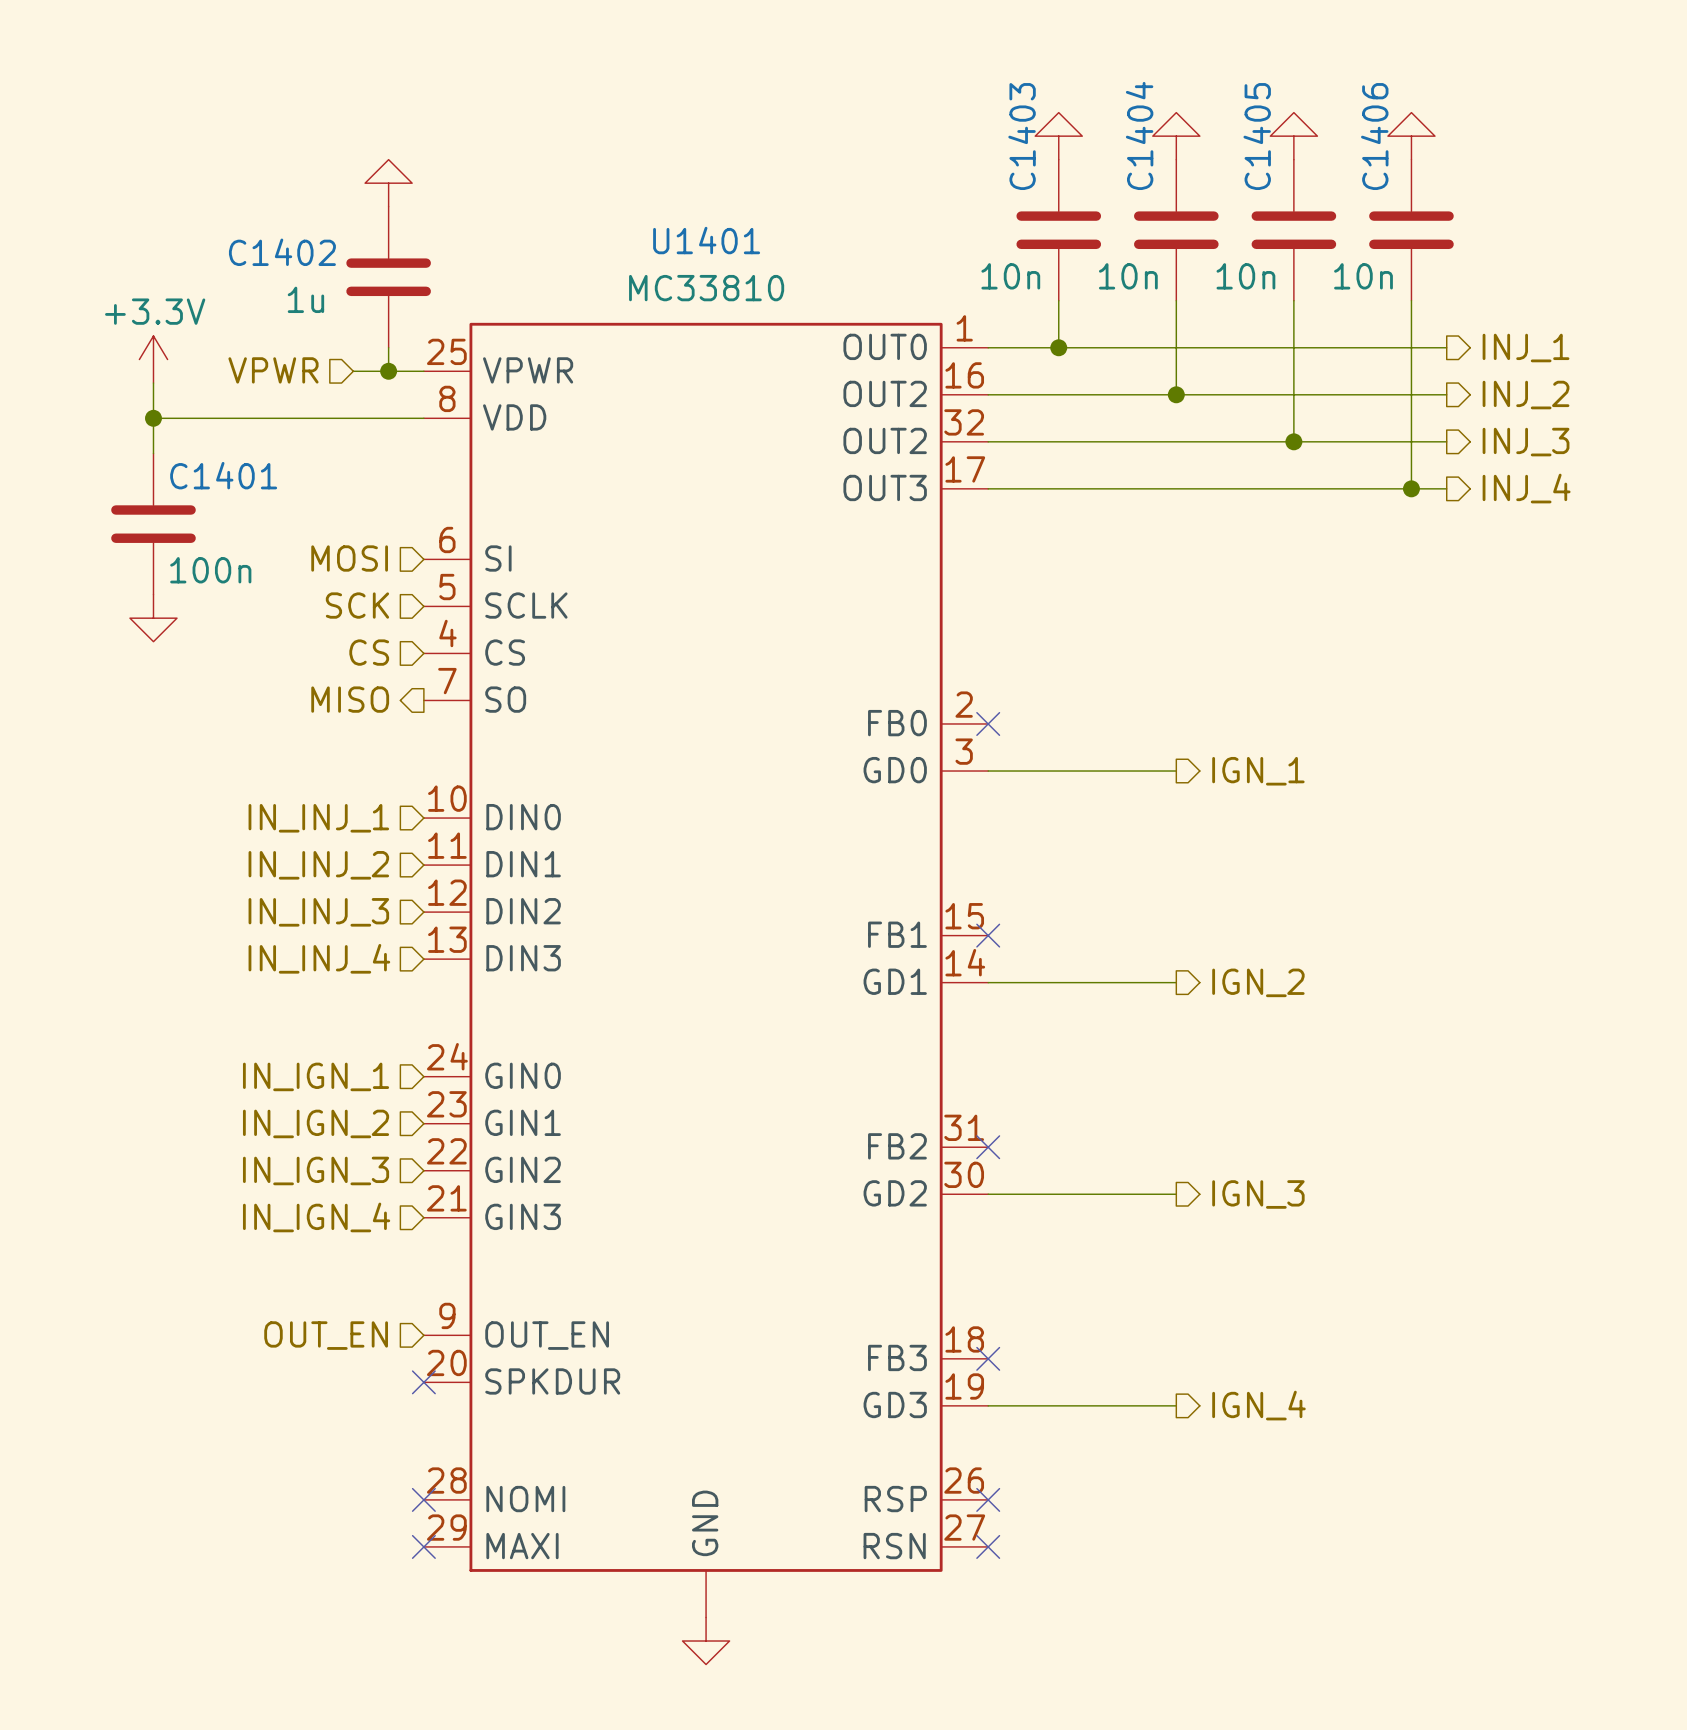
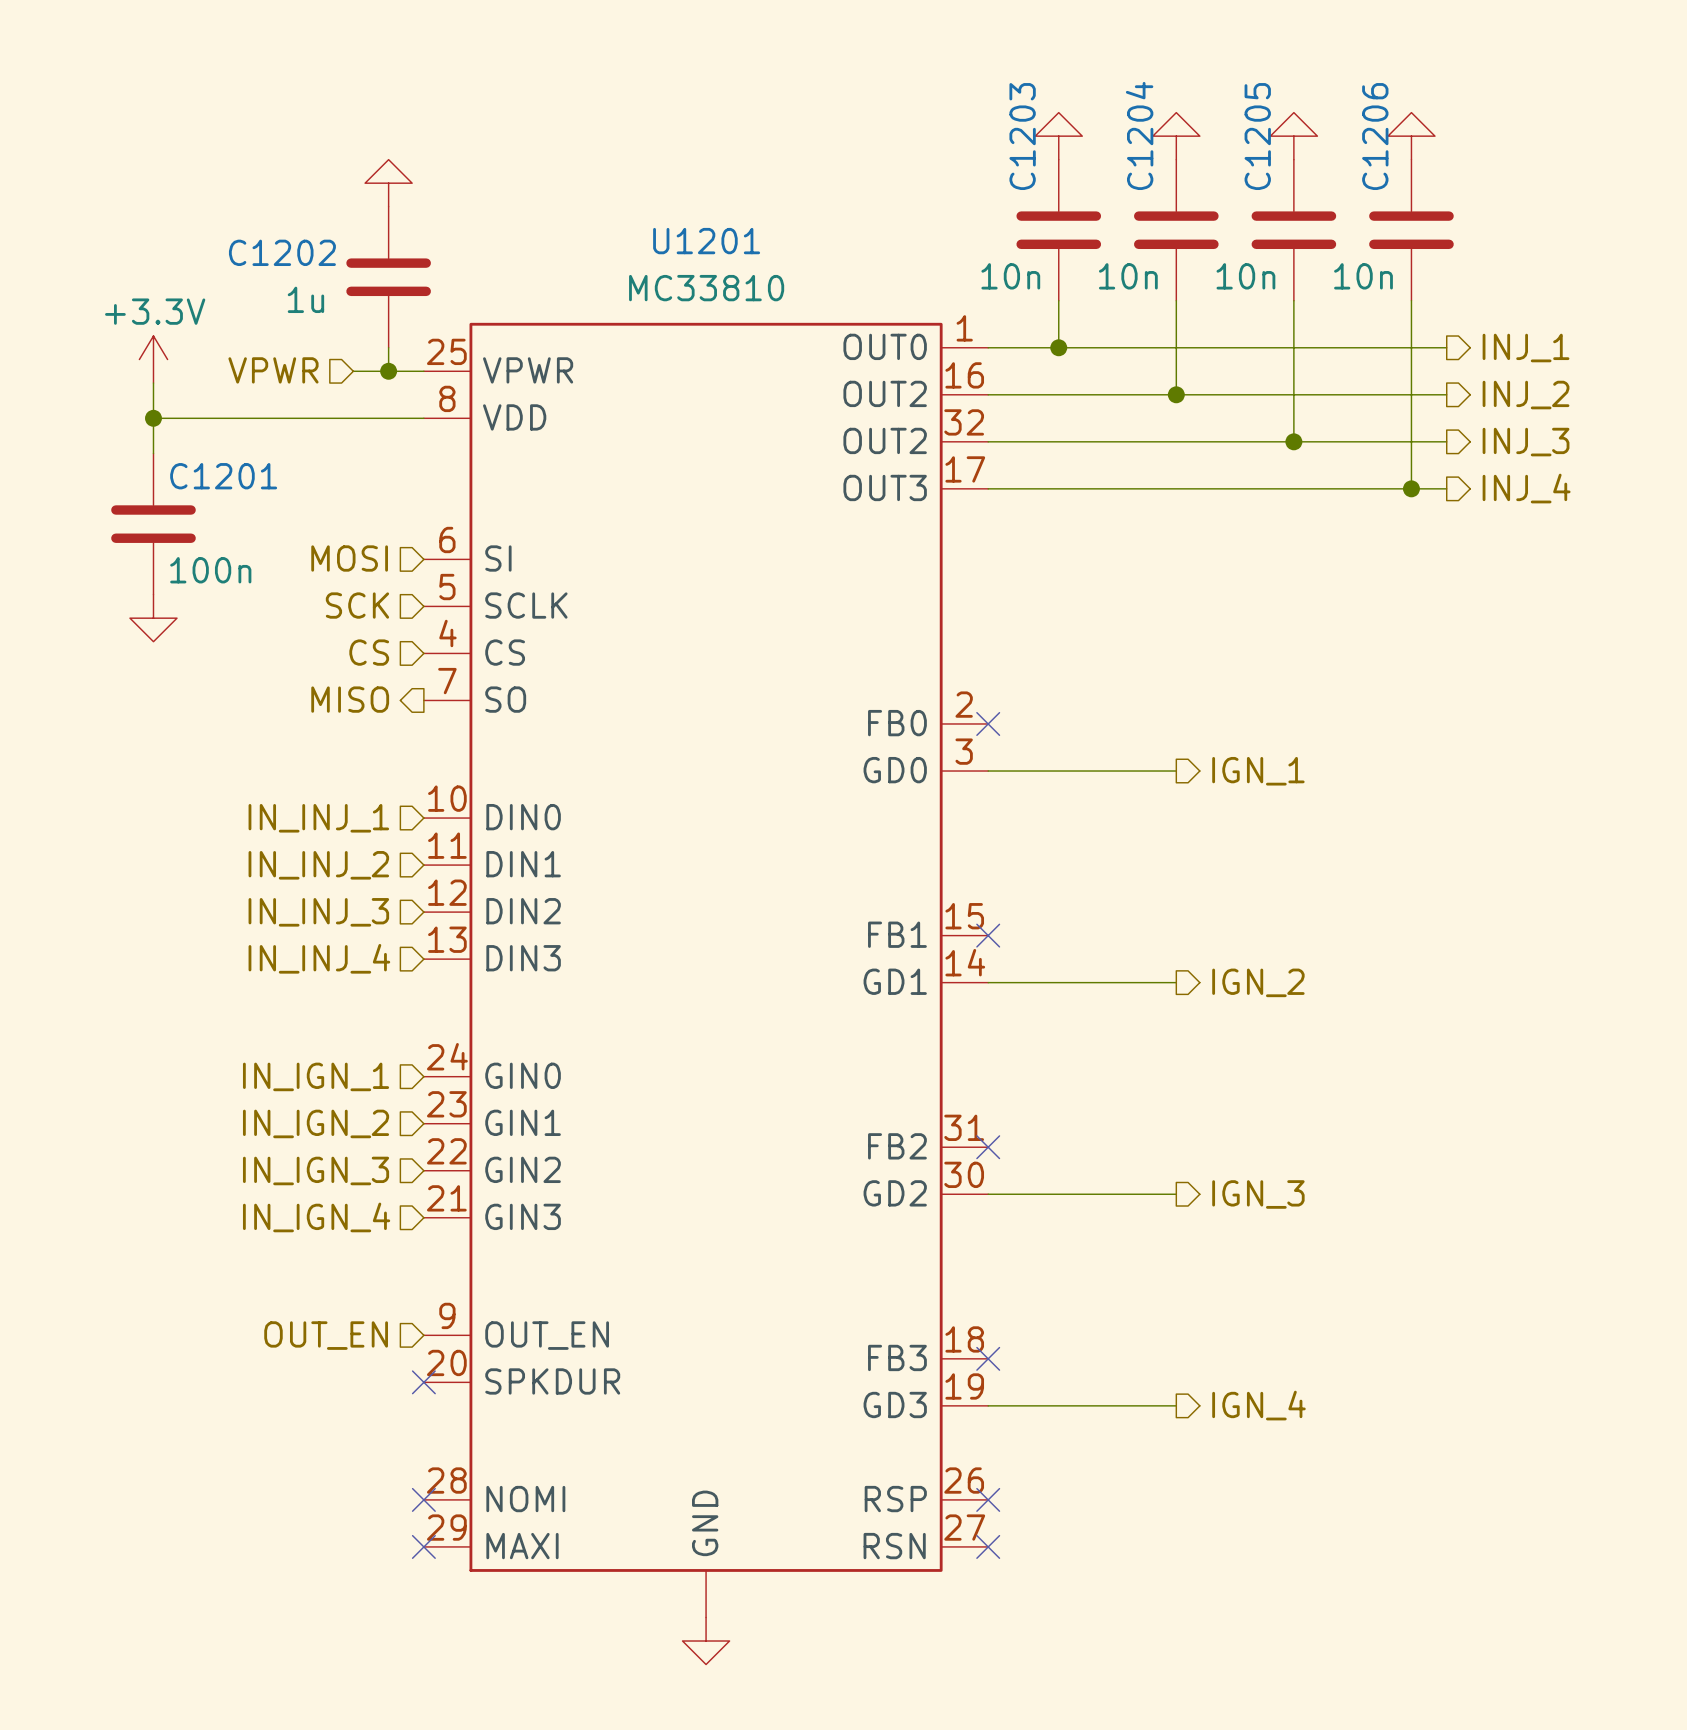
C1404 name: C1404 (1139, 135) -> C1204 (1139, 135)
C1403 name: C1403 (1022, 136) -> C1203 (1022, 136)
C1405 name: C1405 (1257, 136) -> C1205 (1257, 136)
C1406 name: C1406 (1374, 136) -> C1206 (1375, 136)
U1401 name: U1401 (706, 240) -> U1201 (706, 241)
C1402 name: C1402 (282, 252) -> C1202 (282, 252)
C1401 name: C1401 (223, 475) -> C1201 (223, 476)

